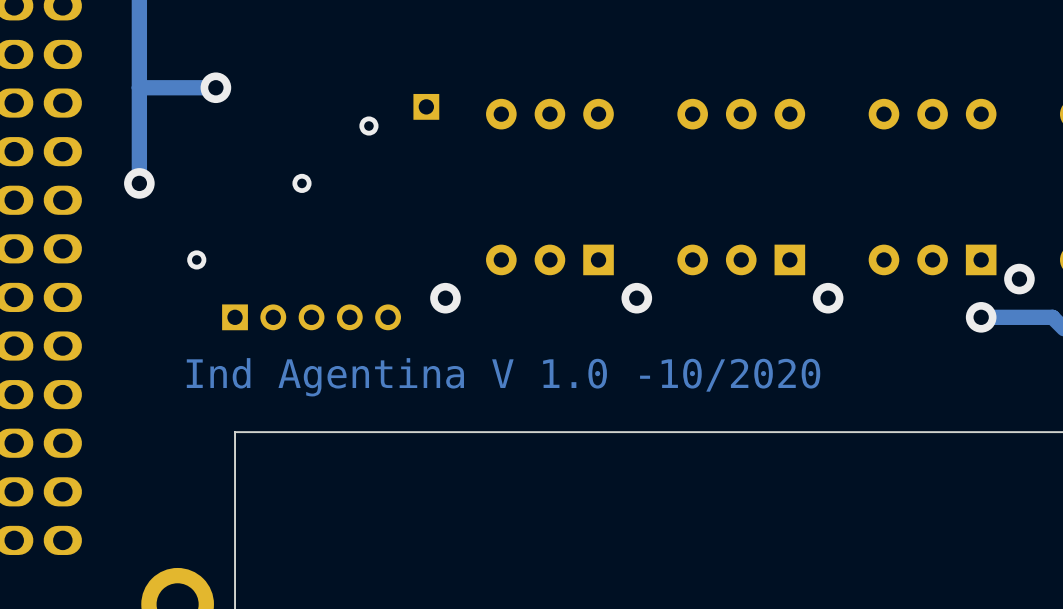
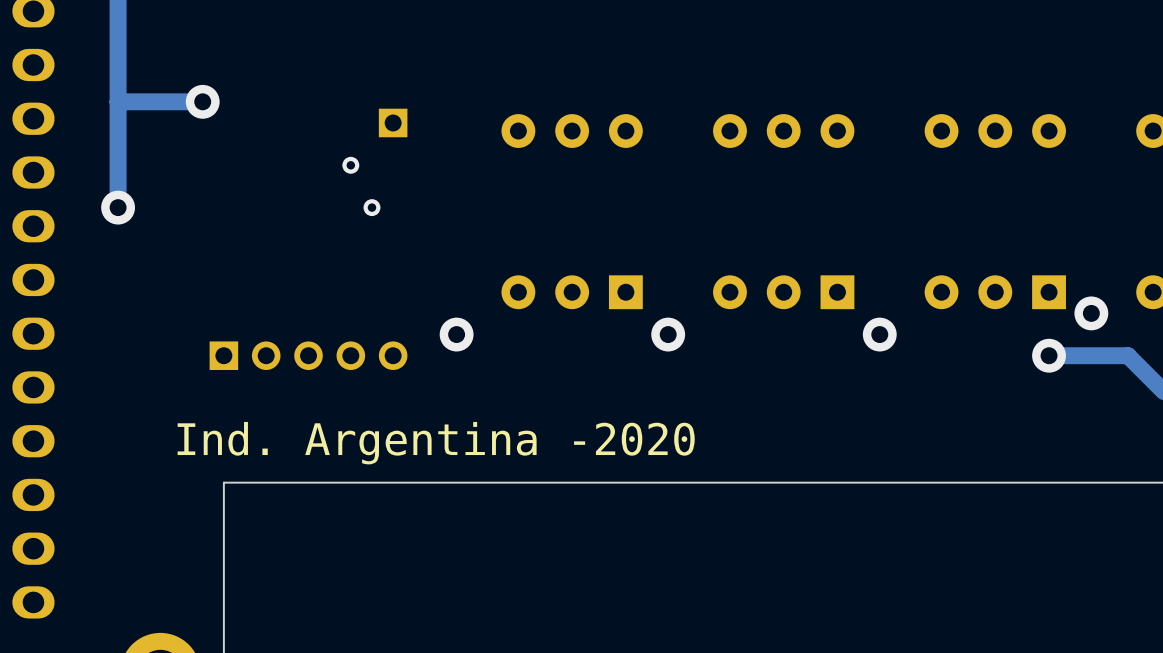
part position: (426, 106) -> (393, 122)
via: (368, 126) -> none
via: none -> (350, 165)
via: (301, 183) -> none
via: none -> (371, 207)
via: (196, 259) -> none
text: Ind Agentina V 1.0 -10/2020 (503, 377) -> Ind. Argentina -2020 (436, 443)

